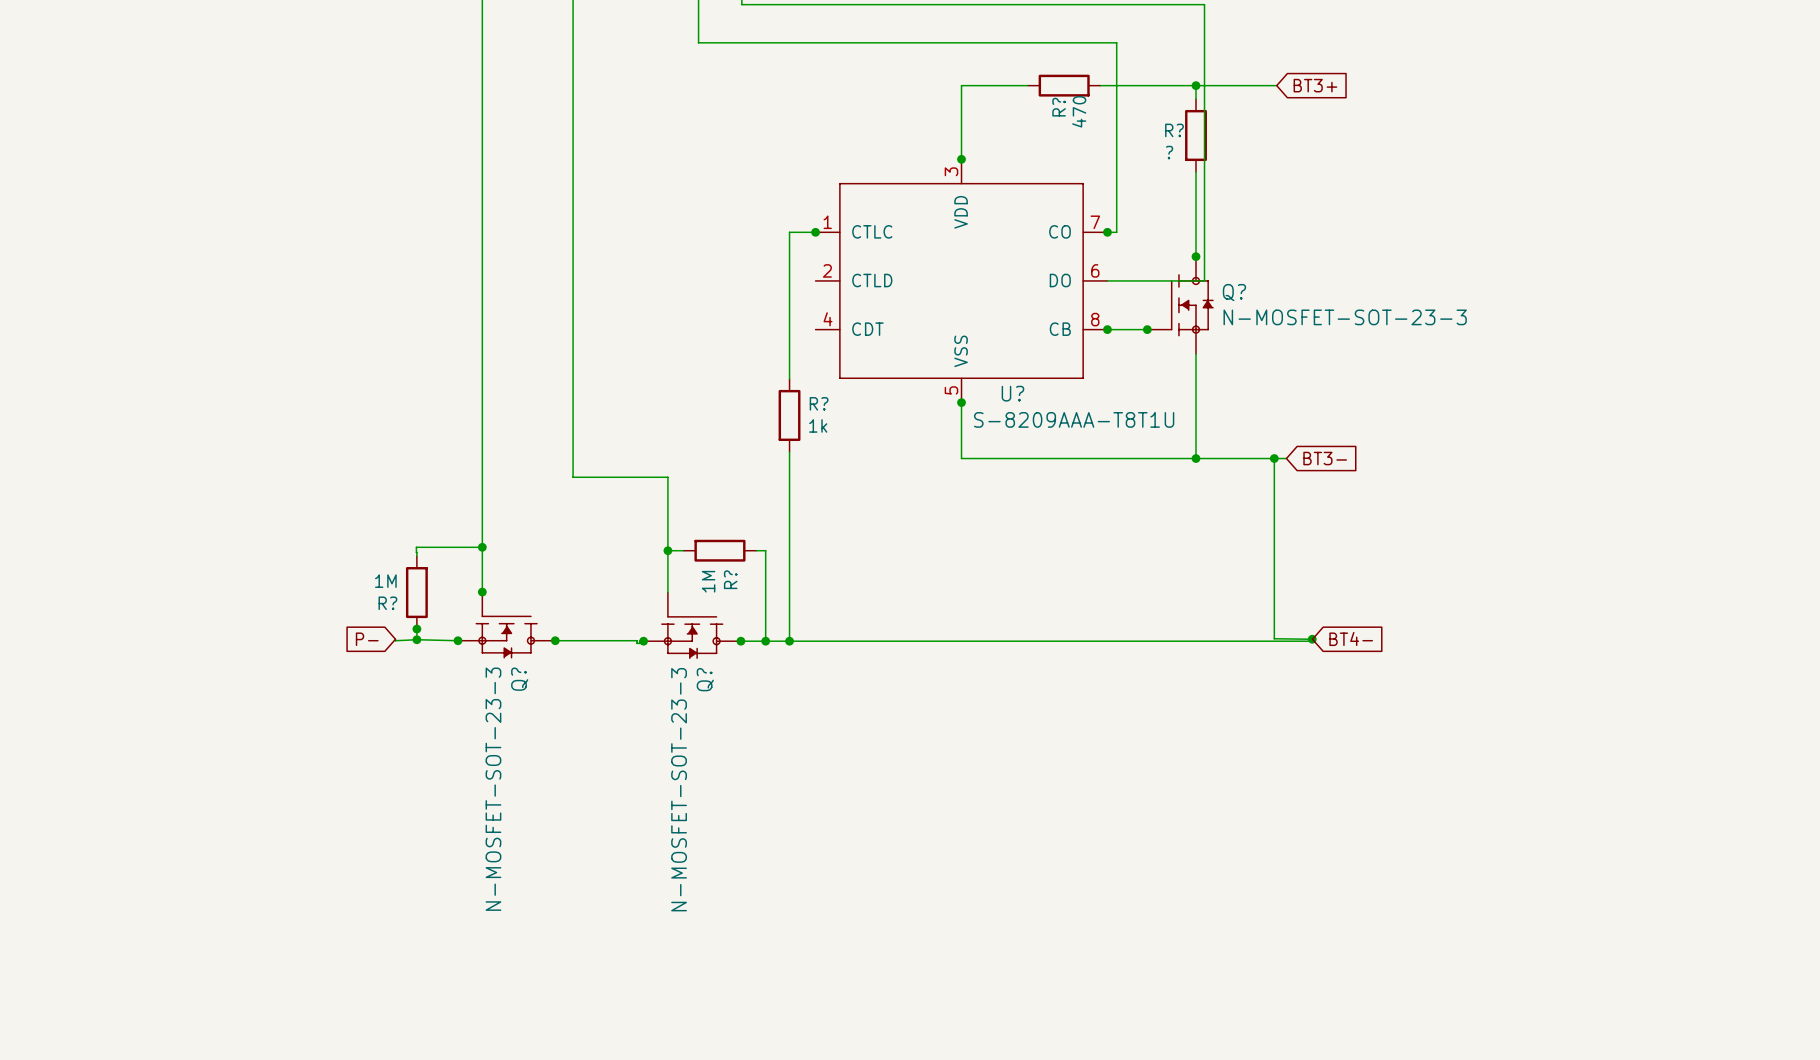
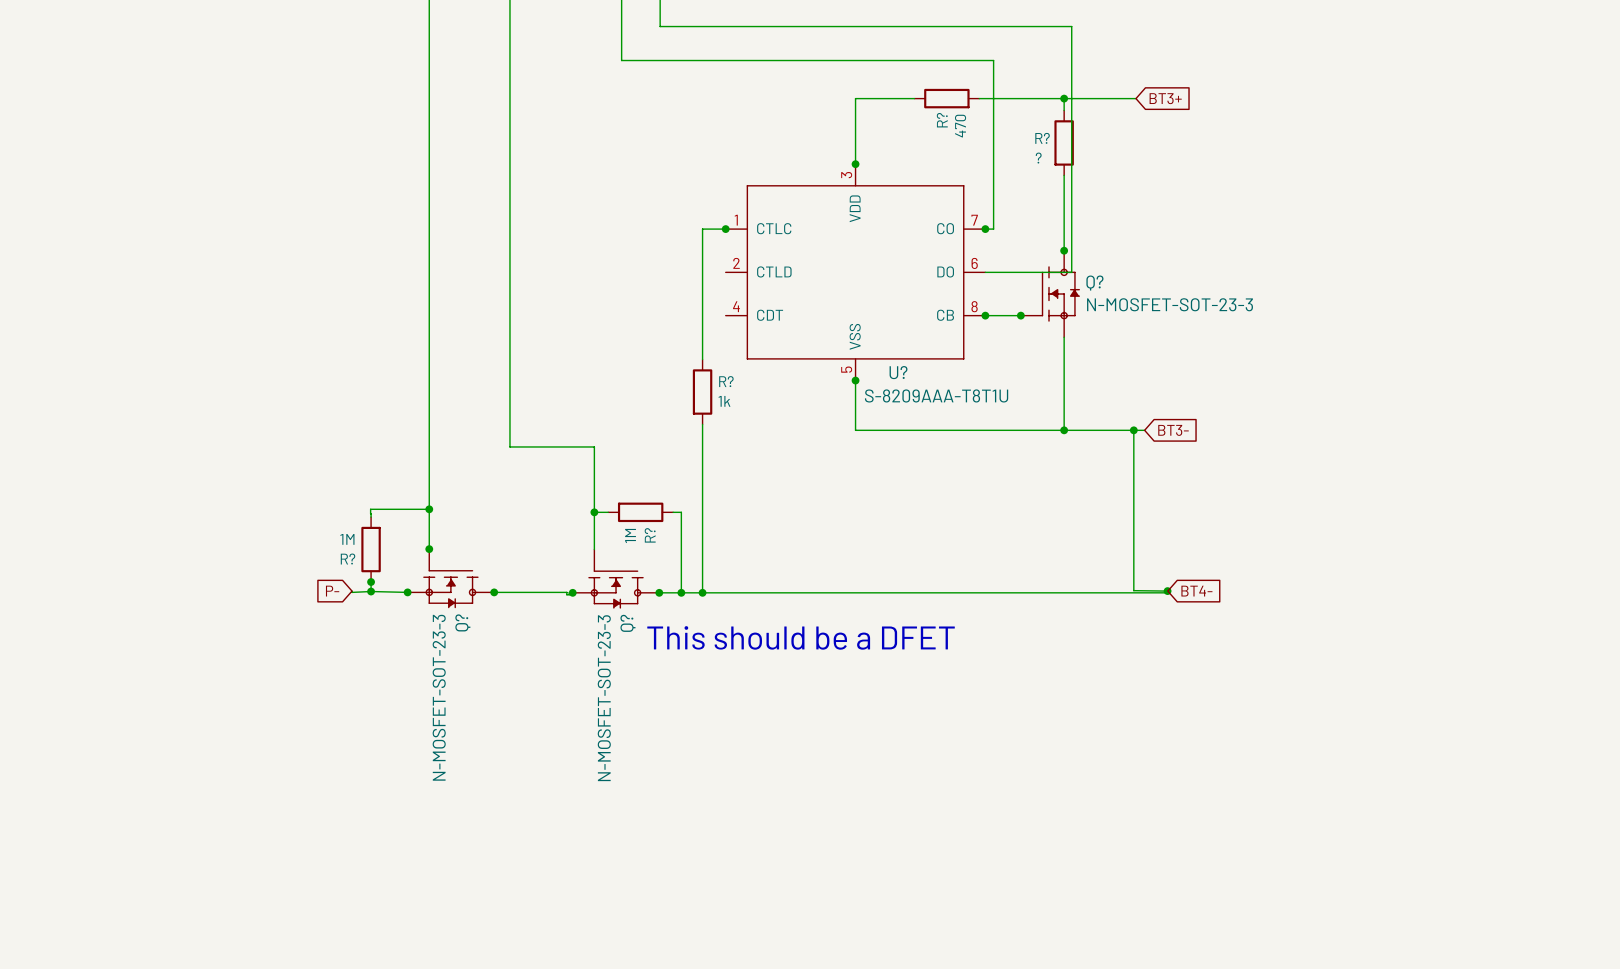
text: none -> This should be a DFET (801, 637)

